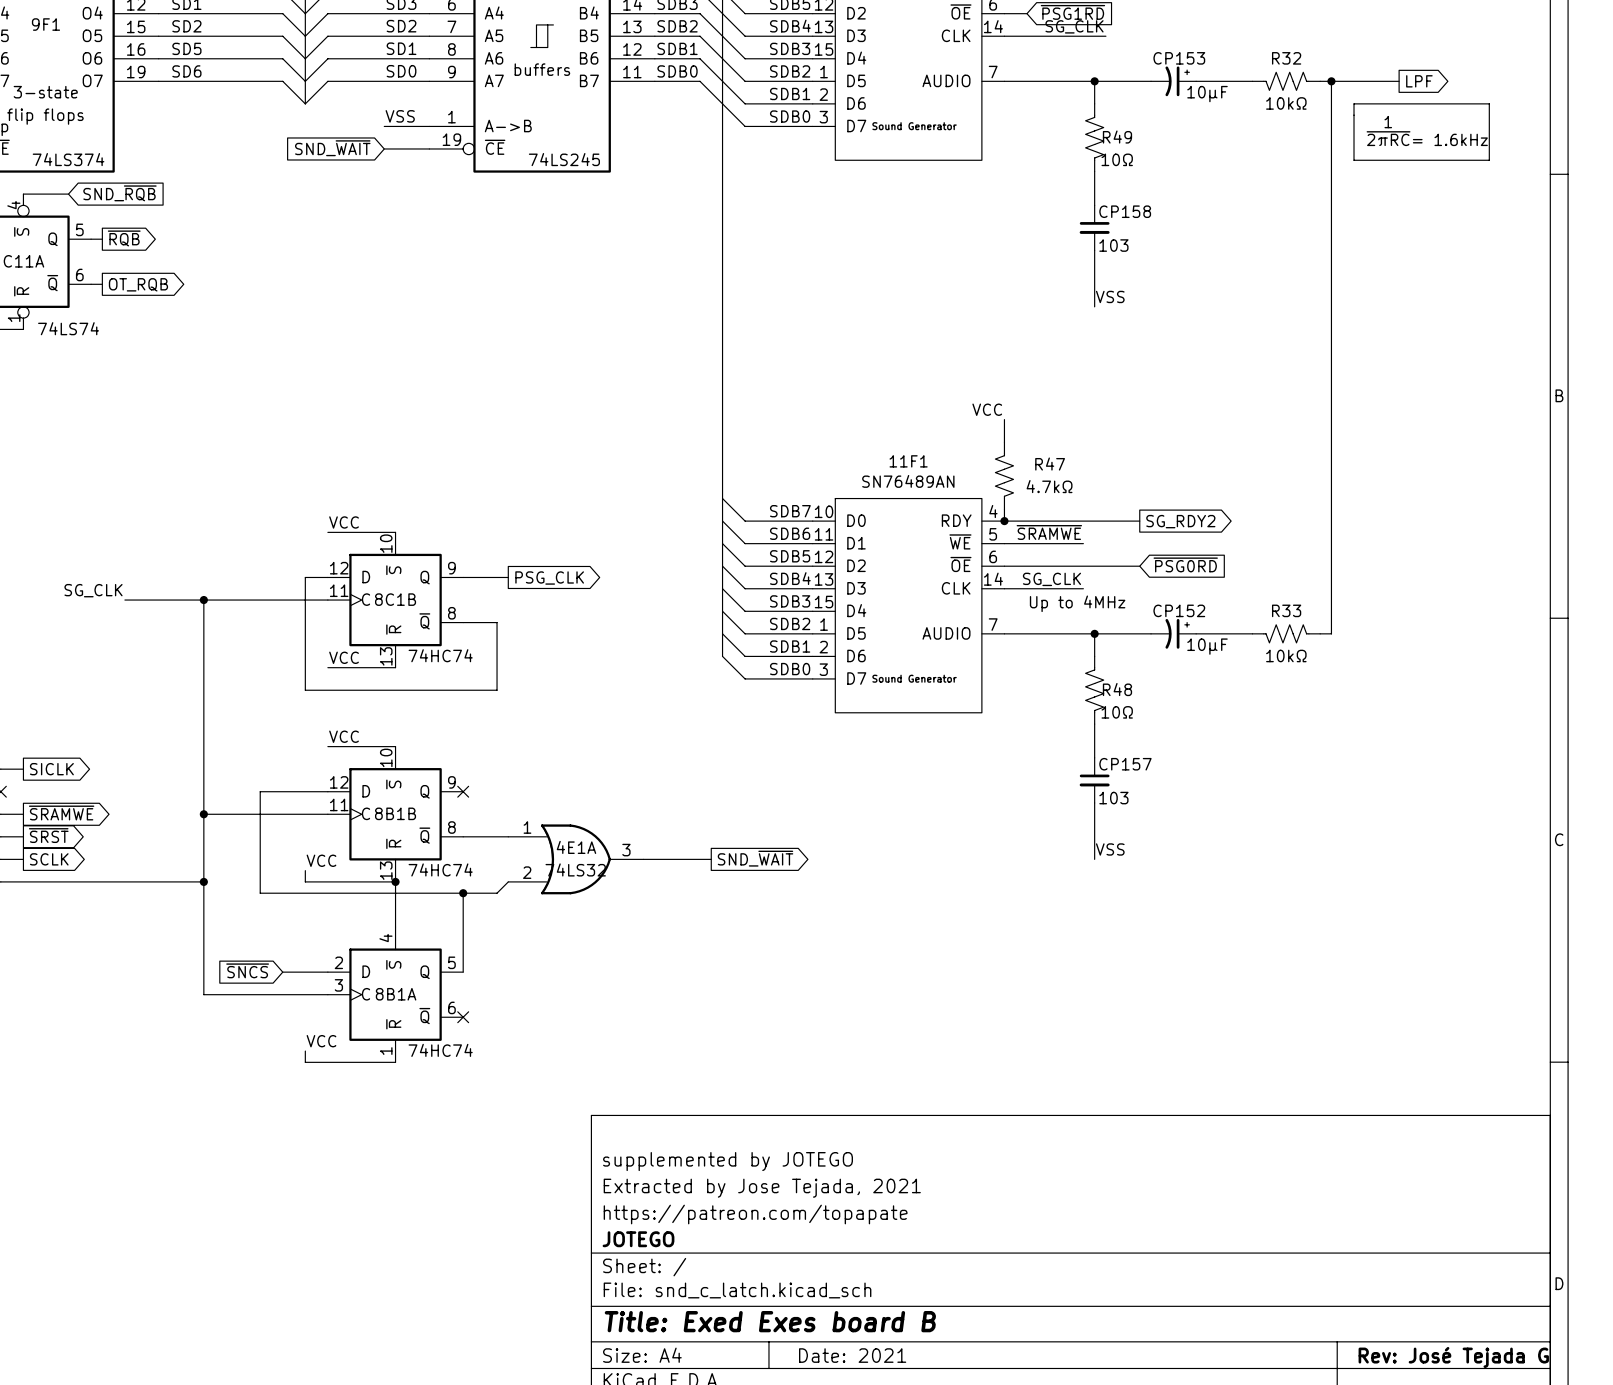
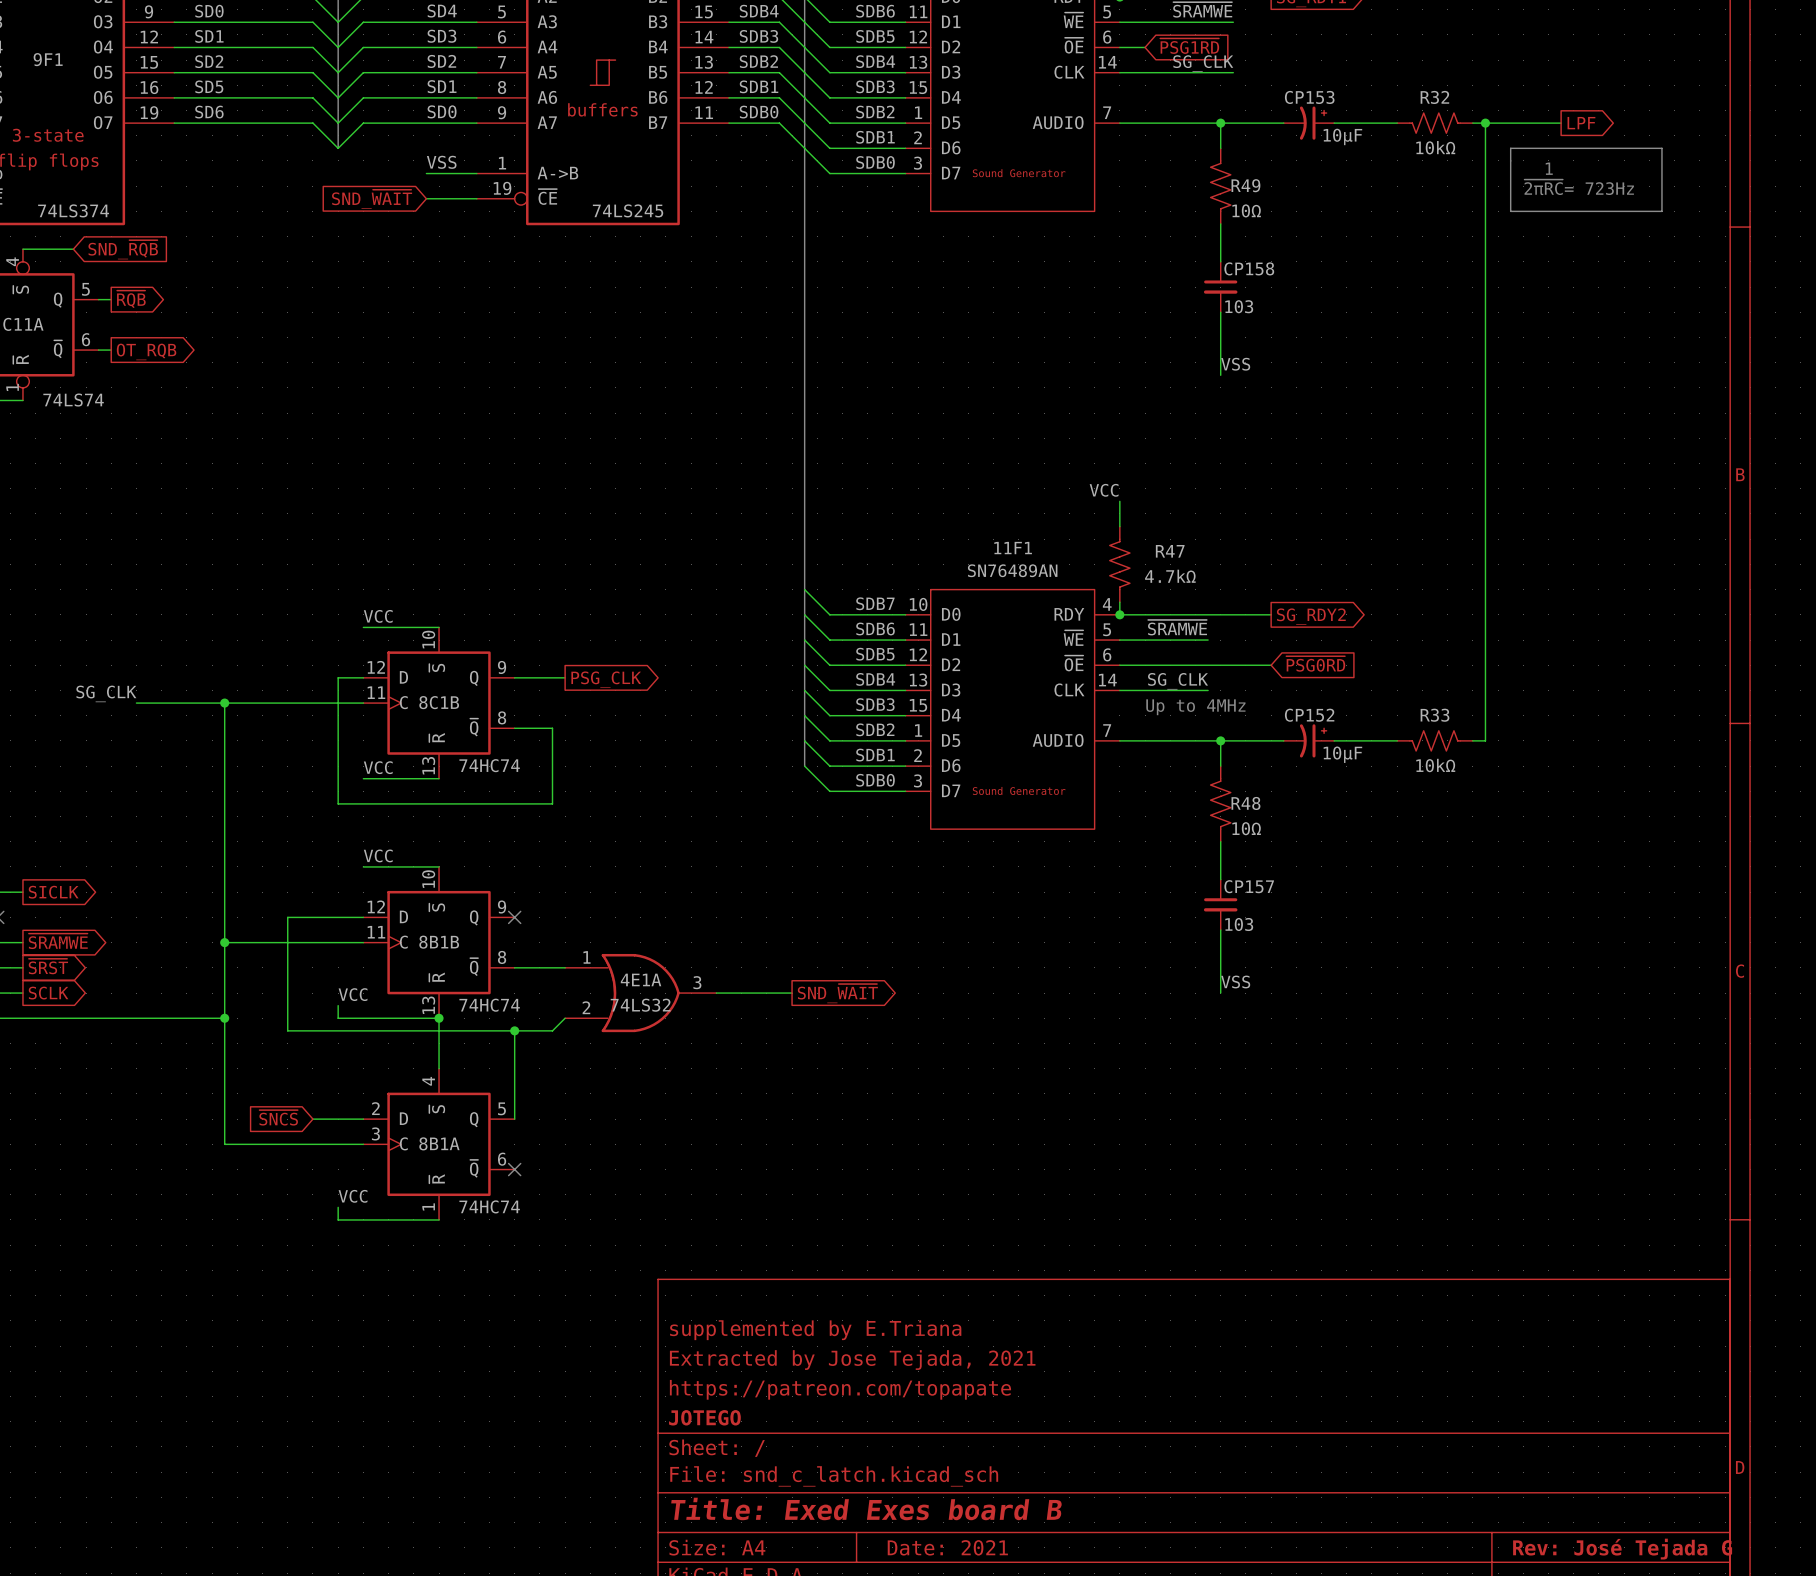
text: ~{2πRC}= 1.6kHz (1427, 138) -> ~{2πRC}= 723Hz (1579, 187)
title block: supplemented by JOTEGO (728, 1161) -> supplemented by E.Triana (815, 1330)

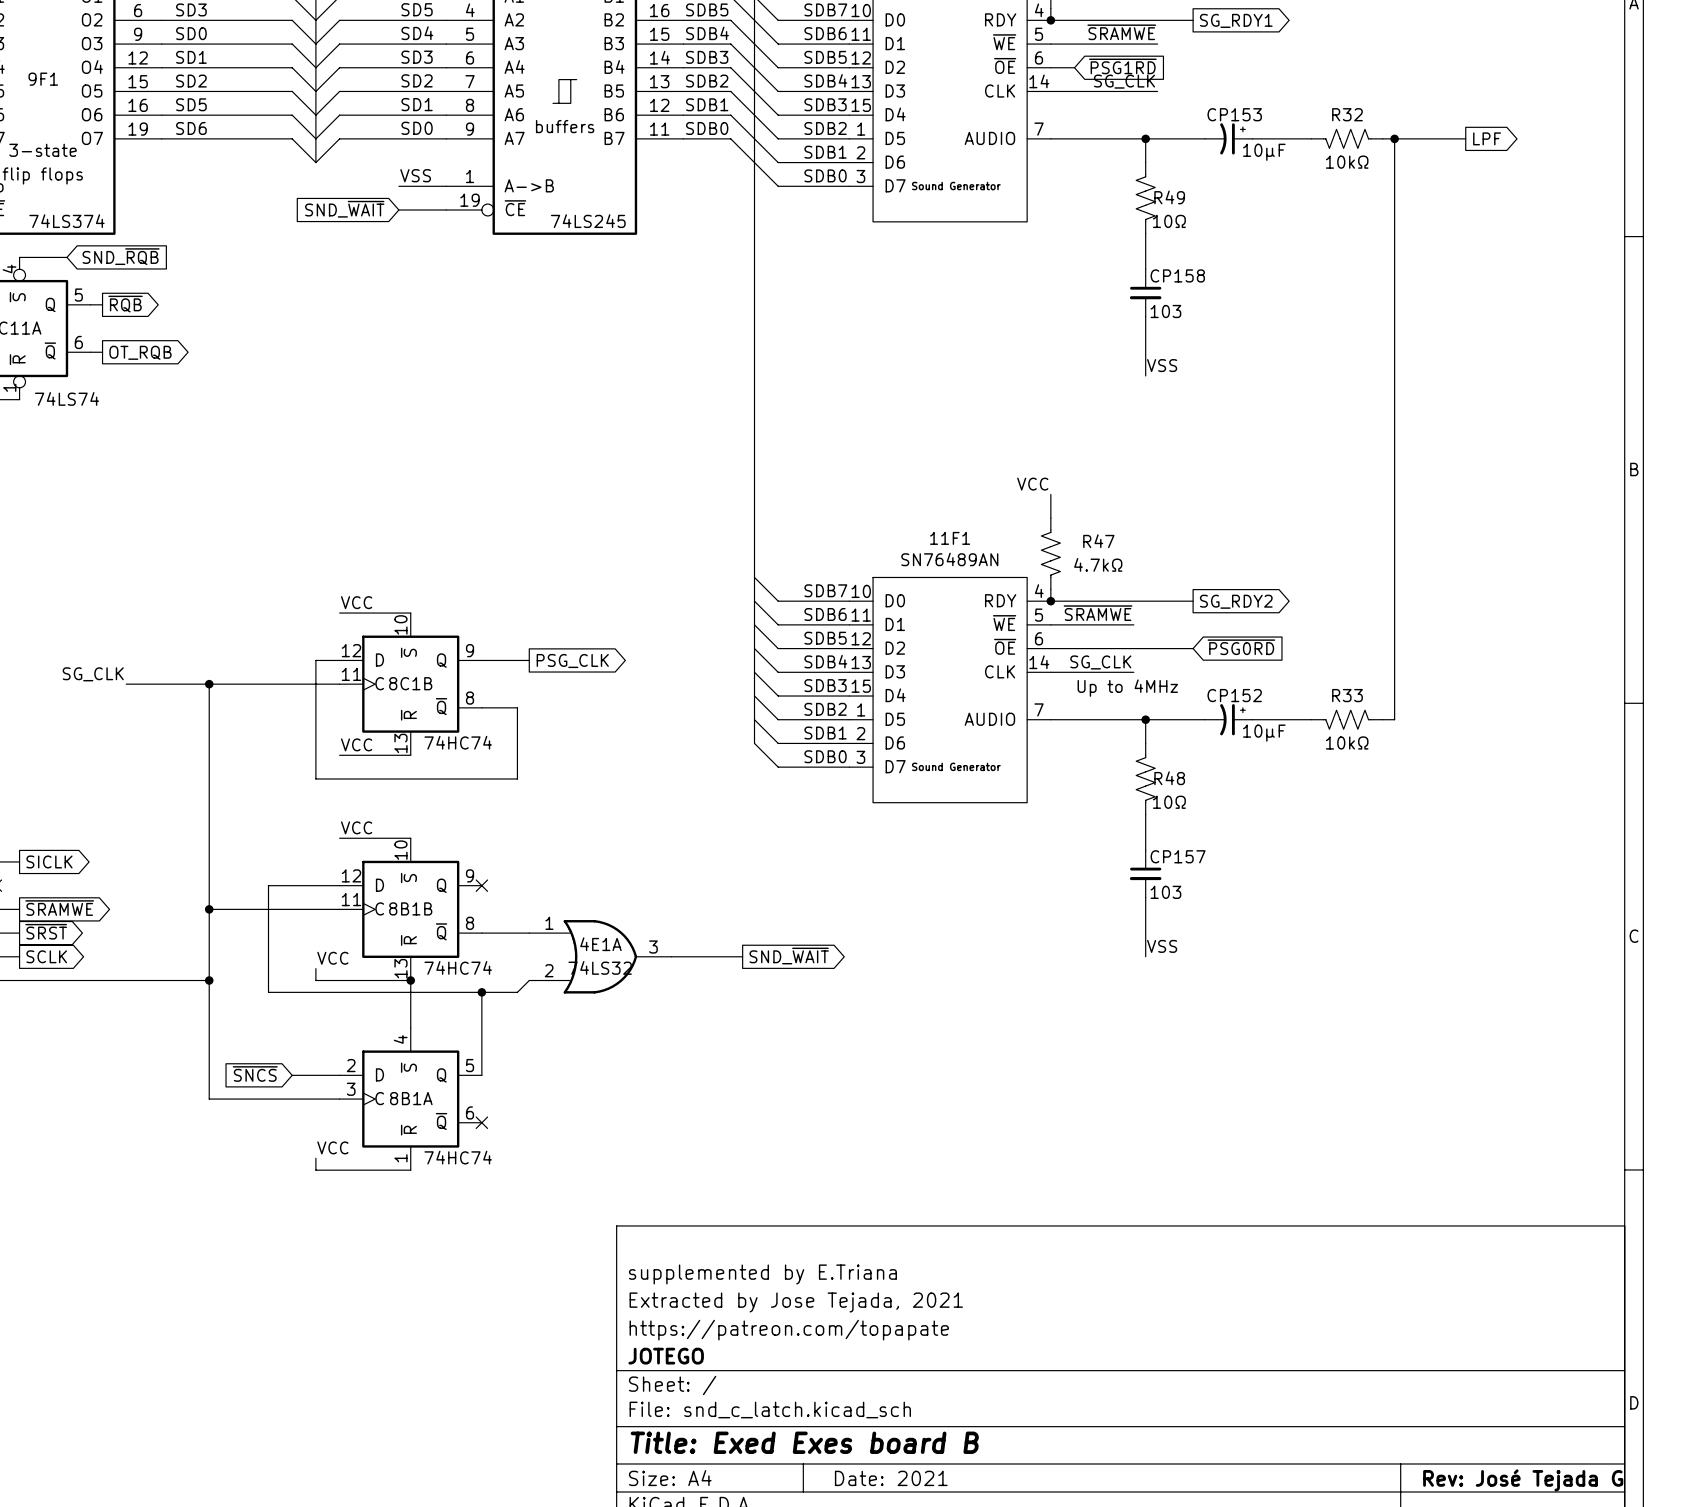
line: (1510, 148) (1510, 211) (1661, 211) (1661, 148) (1510, 148) -> none
text: 1 (1549, 168) -> none
text: ~{2πRC}= 723Hz (1579, 187) -> none

